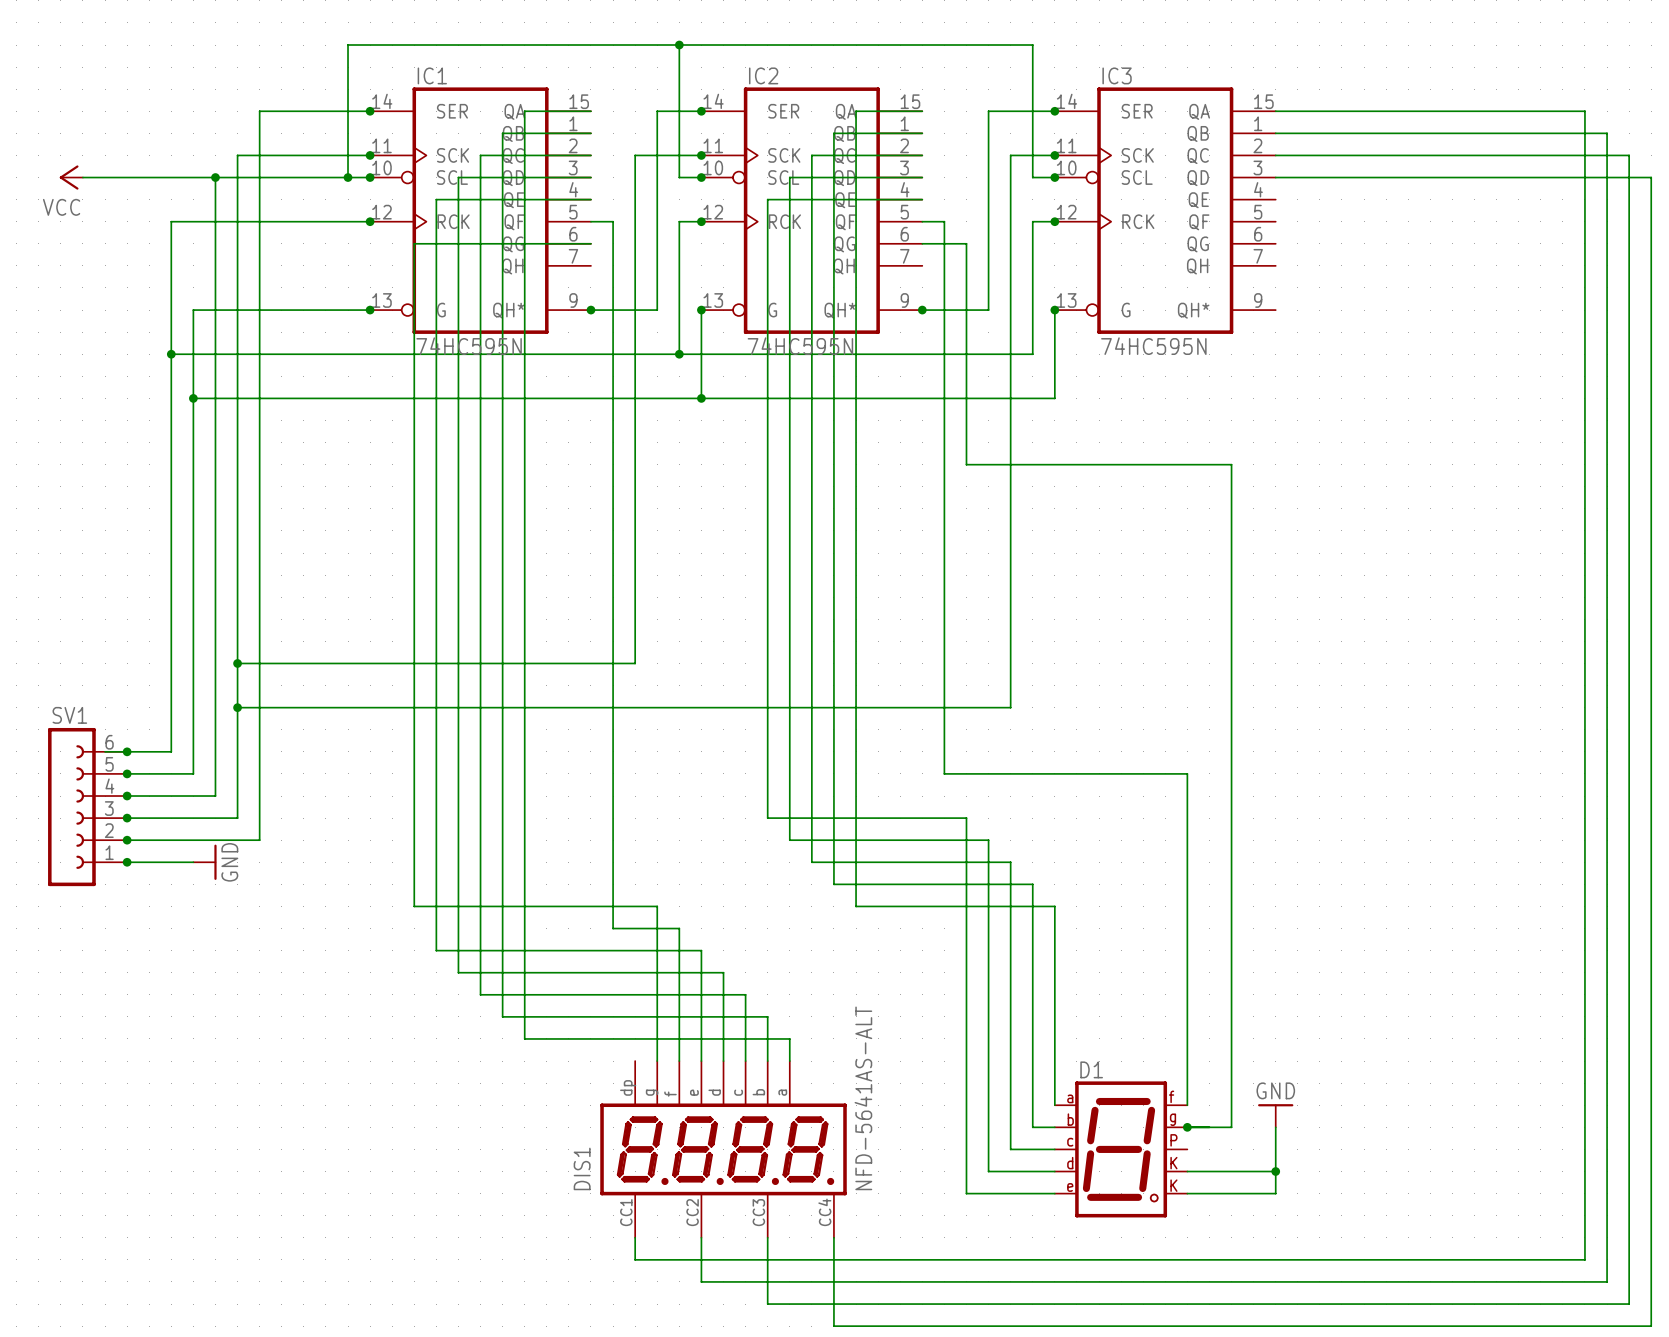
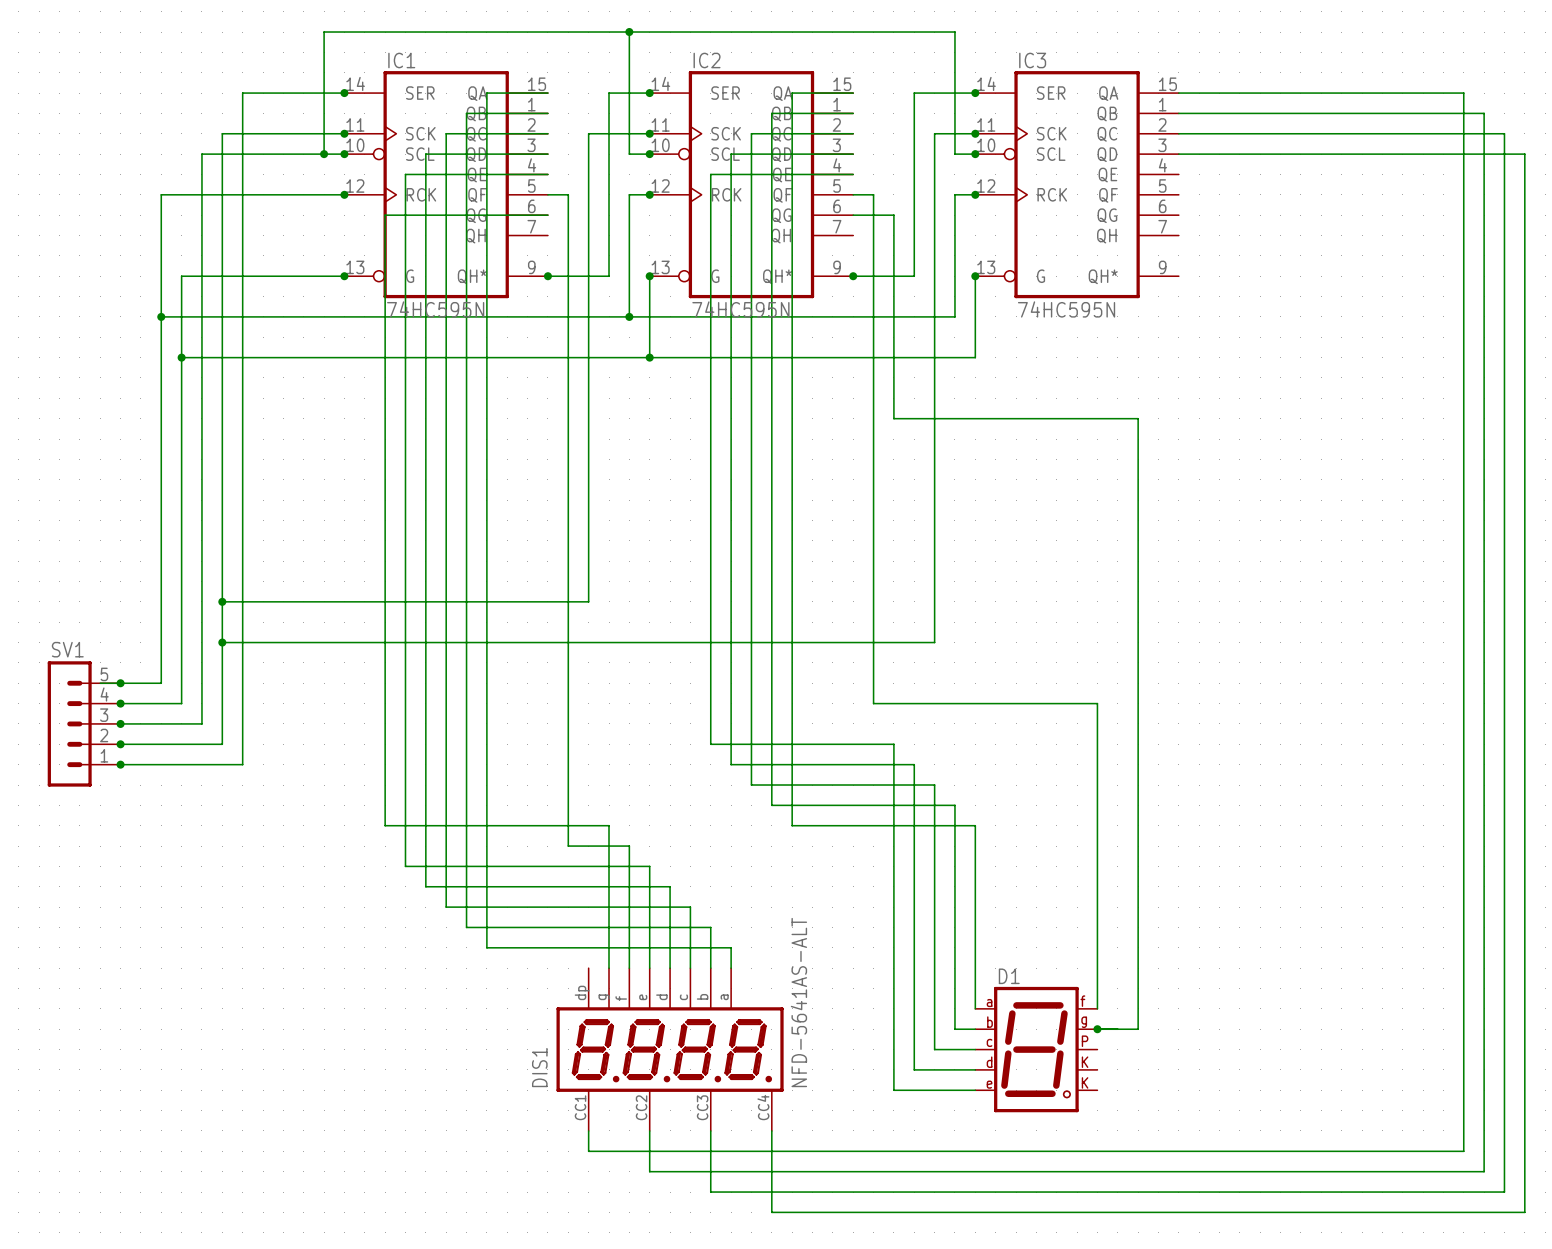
power symbol: VCC (71, 177) -> none
wire: (82, 177) (215, 177) -> none
junction: (215, 177) -> none
SV1 symbol: [48, 727, 128, 887] -> [47, 661, 121, 787]
wire: (127, 862) (193, 862) -> none
junction: (127, 862) -> none
power symbol: GND (204, 862) -> none
power symbol: GND (1275, 1115) -> none
wire: (1275, 1127) (1275, 1193) (1187, 1193) -> none
wire: (1187, 1171) (1275, 1171) -> none
junction: (1275, 1171) -> none

